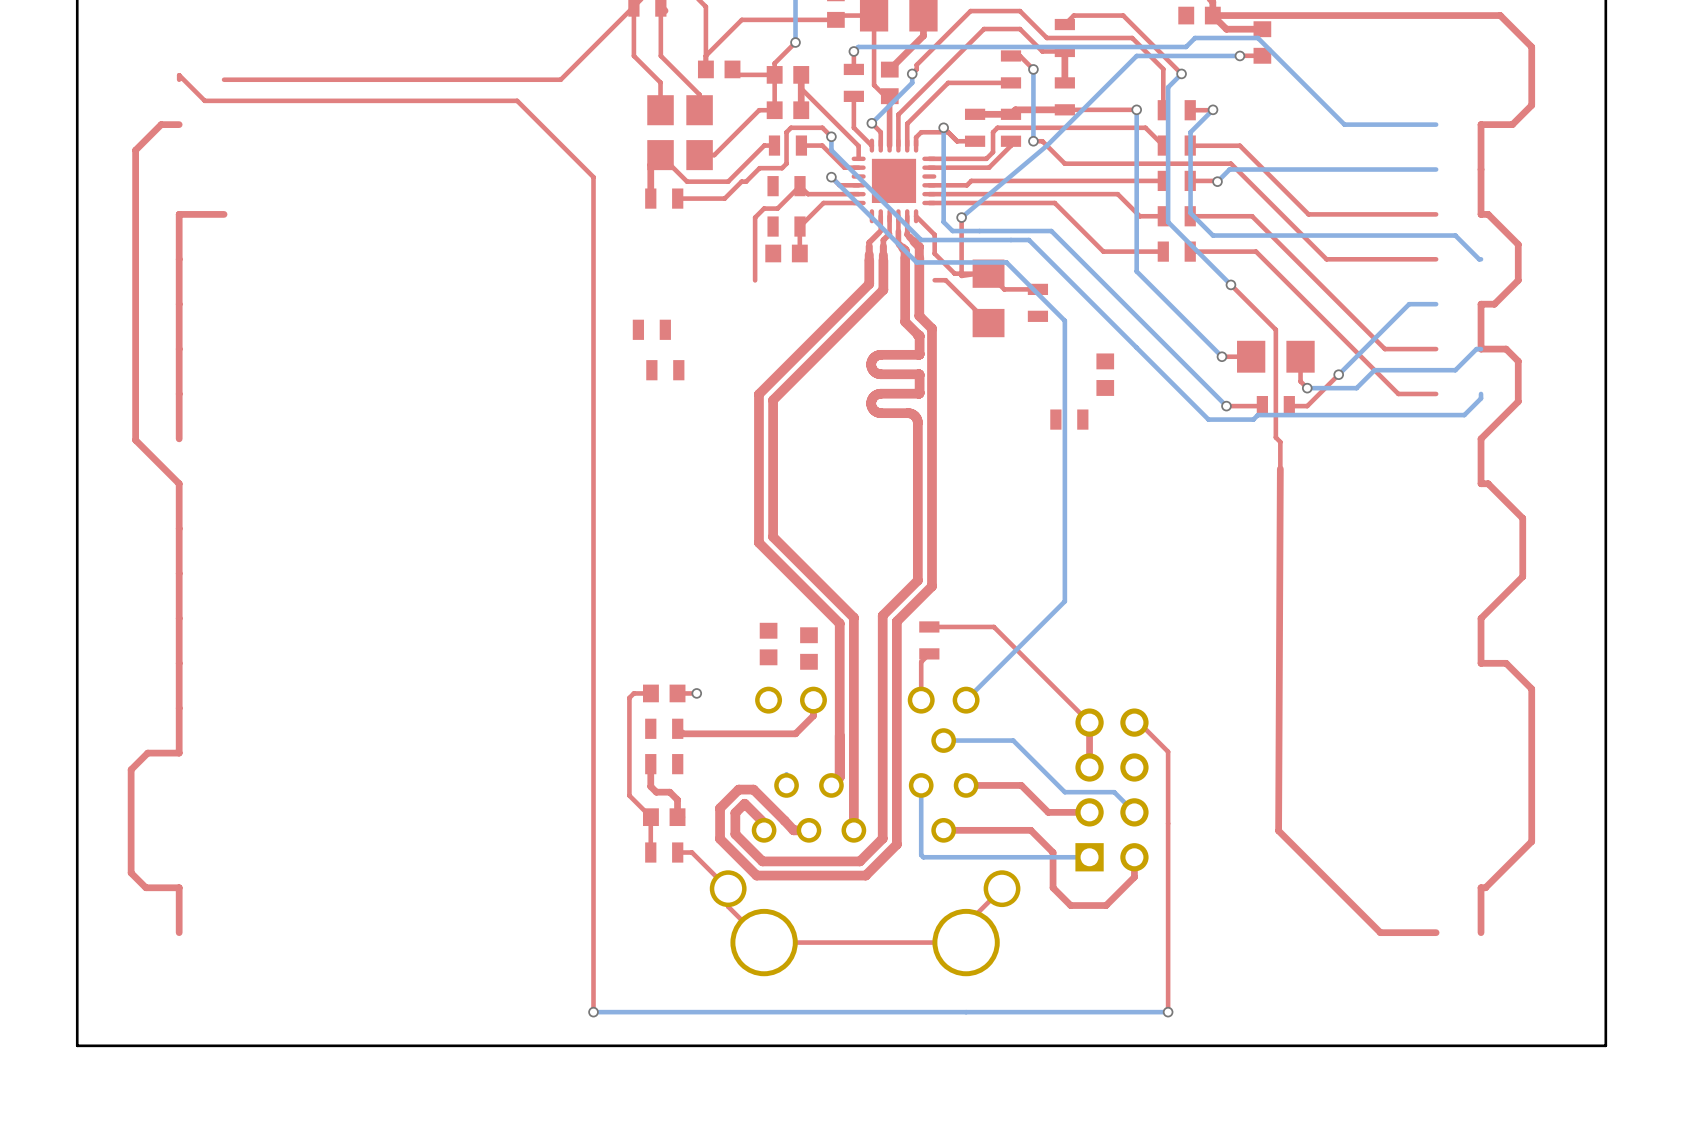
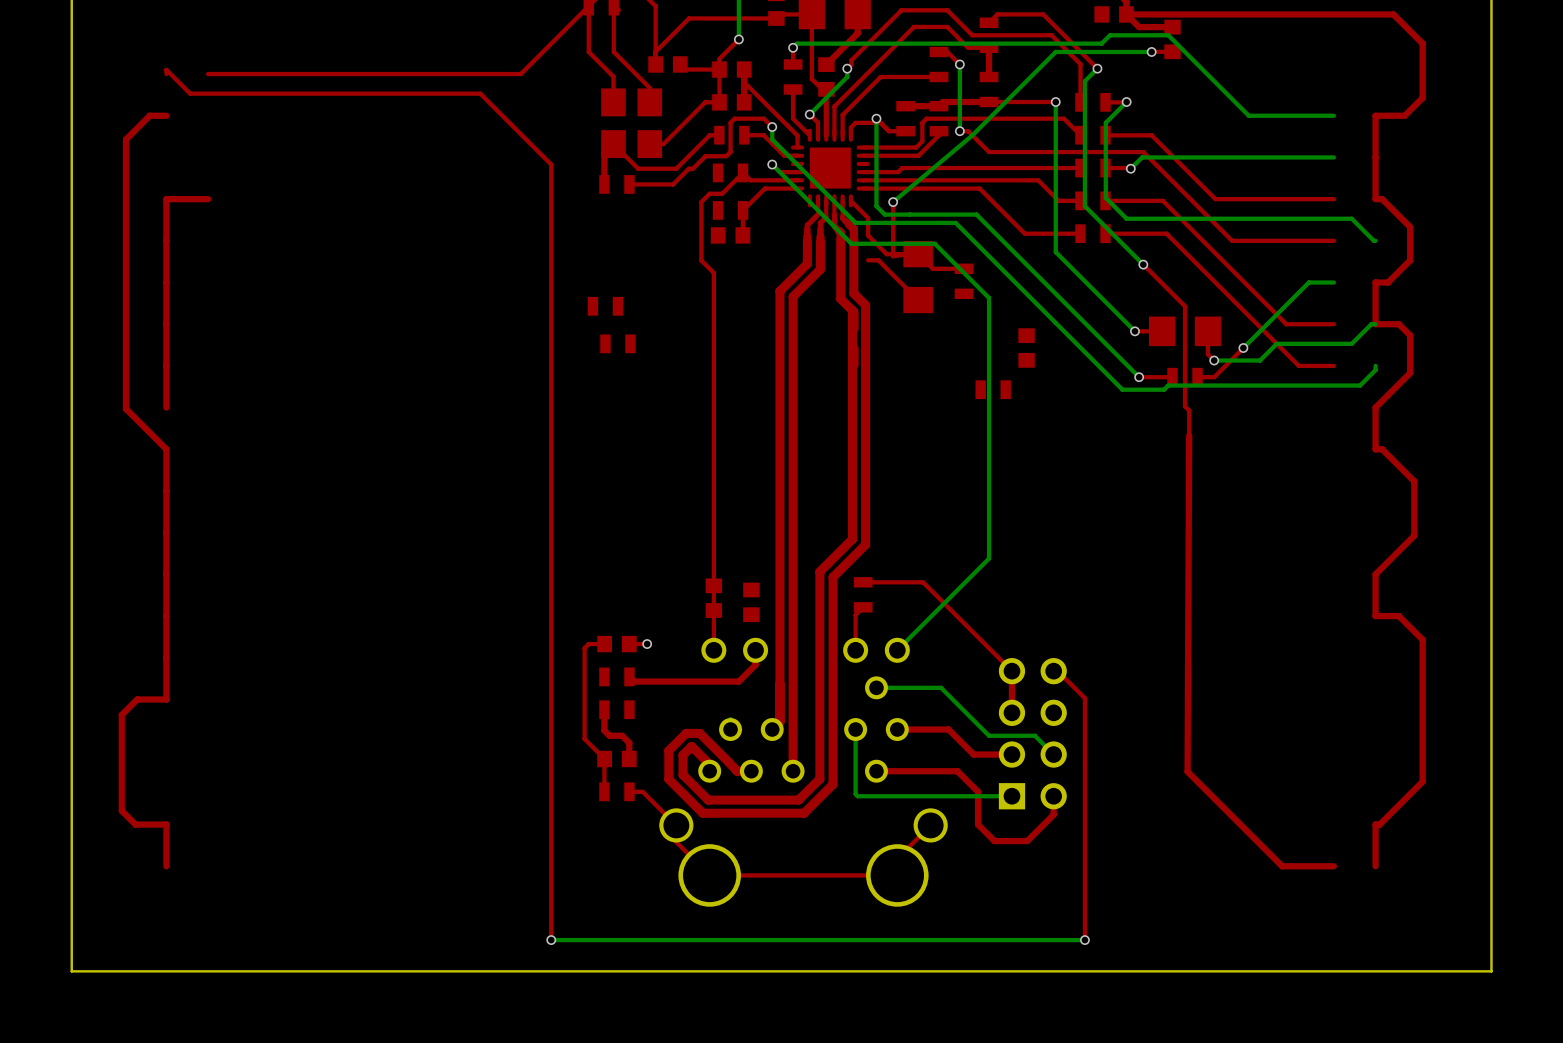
top track: none -> (701, 260) (713, 272) (713, 650)
top track: (839, 313) (758, 394) (758, 542) (839, 623) -> (779, 291) (779, 579)
top track: (853, 319) (773, 400) (773, 536) (853, 617) -> (793, 296) (793, 573)
top track: (918, 354) (878, 355) (873, 358) (871, 364) (873, 370) (878, 374) (918, 374) -> none
top track: (918, 393) (878, 393) (873, 397) (871, 403) (873, 409) (878, 412) (912, 414) (917, 422) -> (852, 310) (852, 392)

